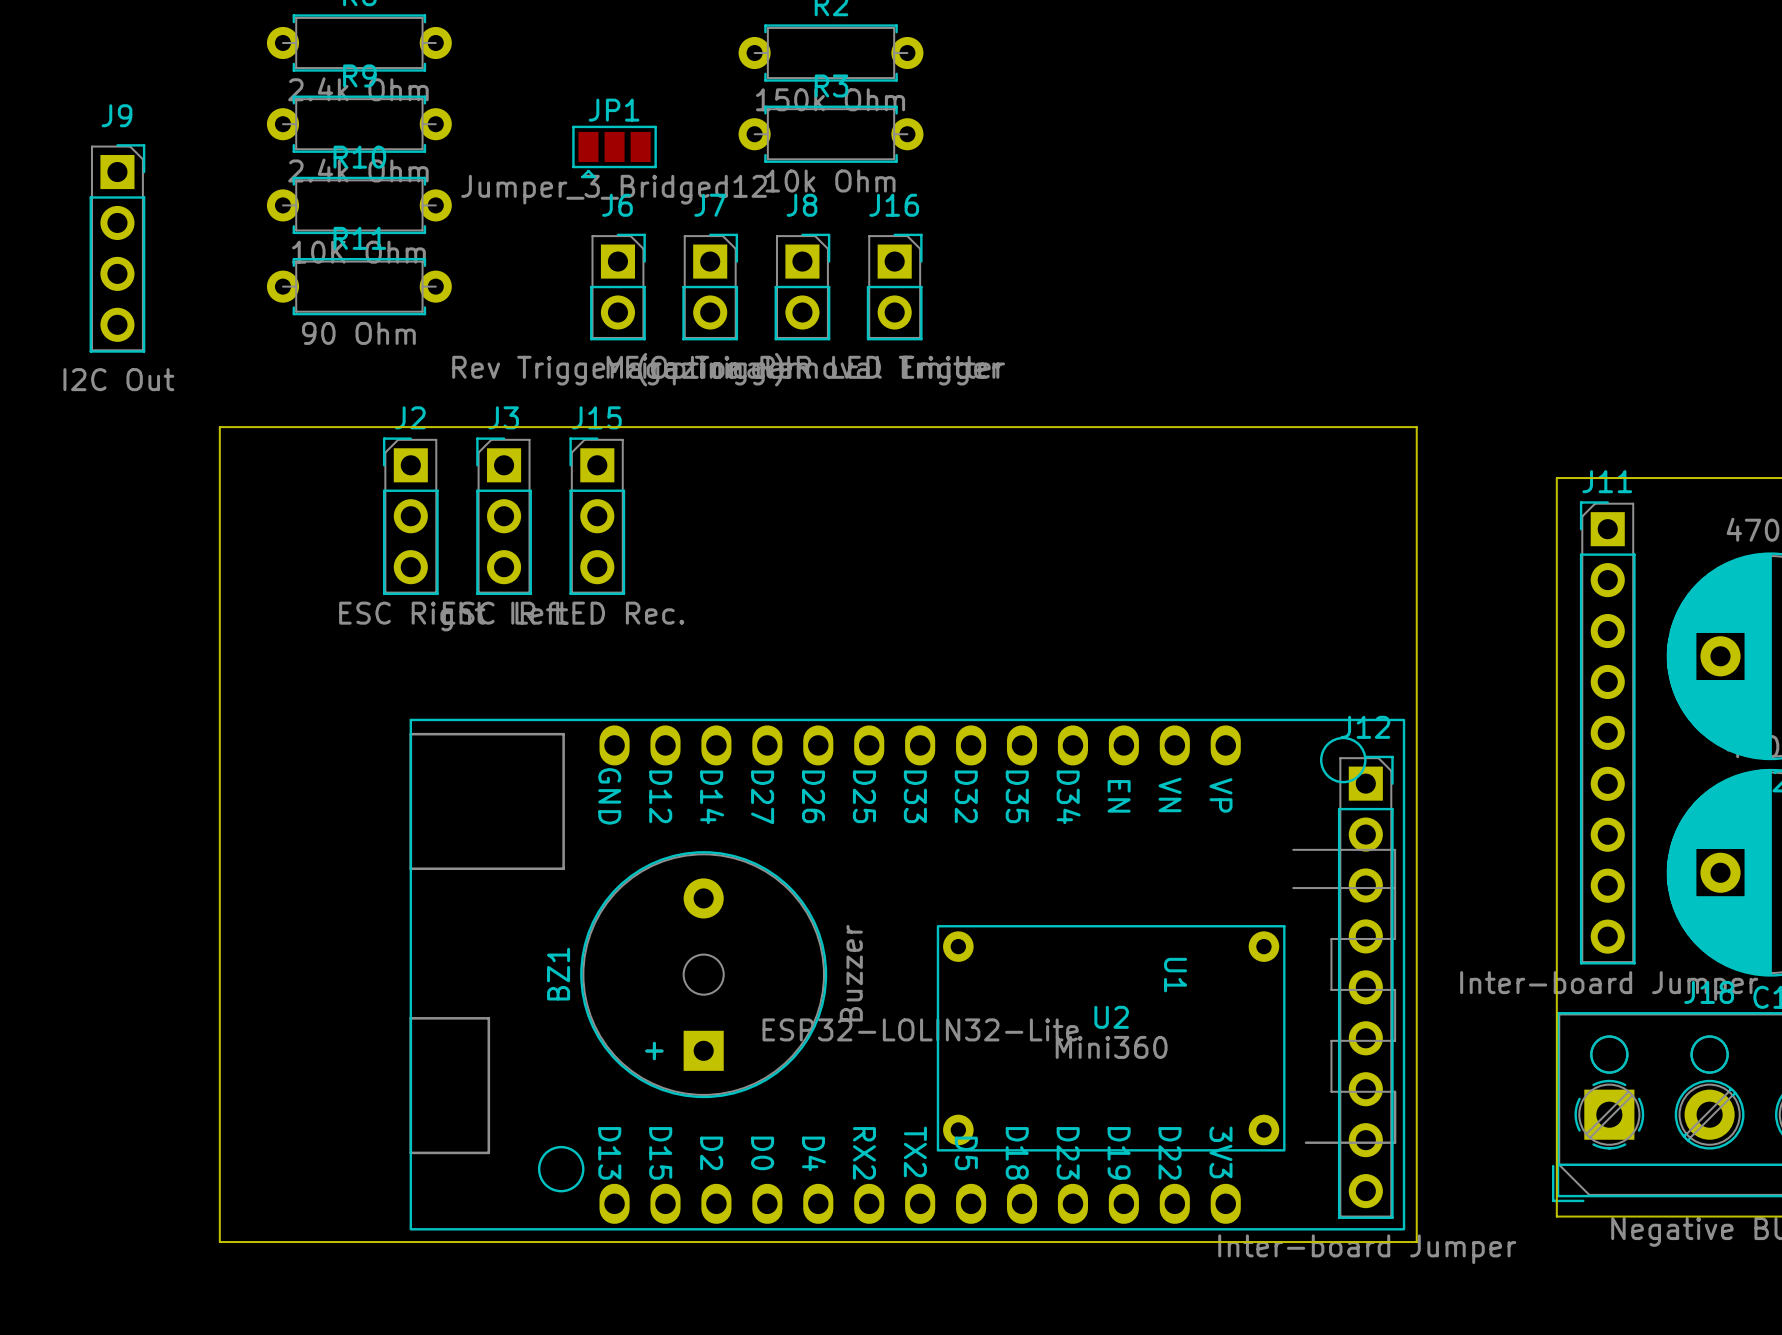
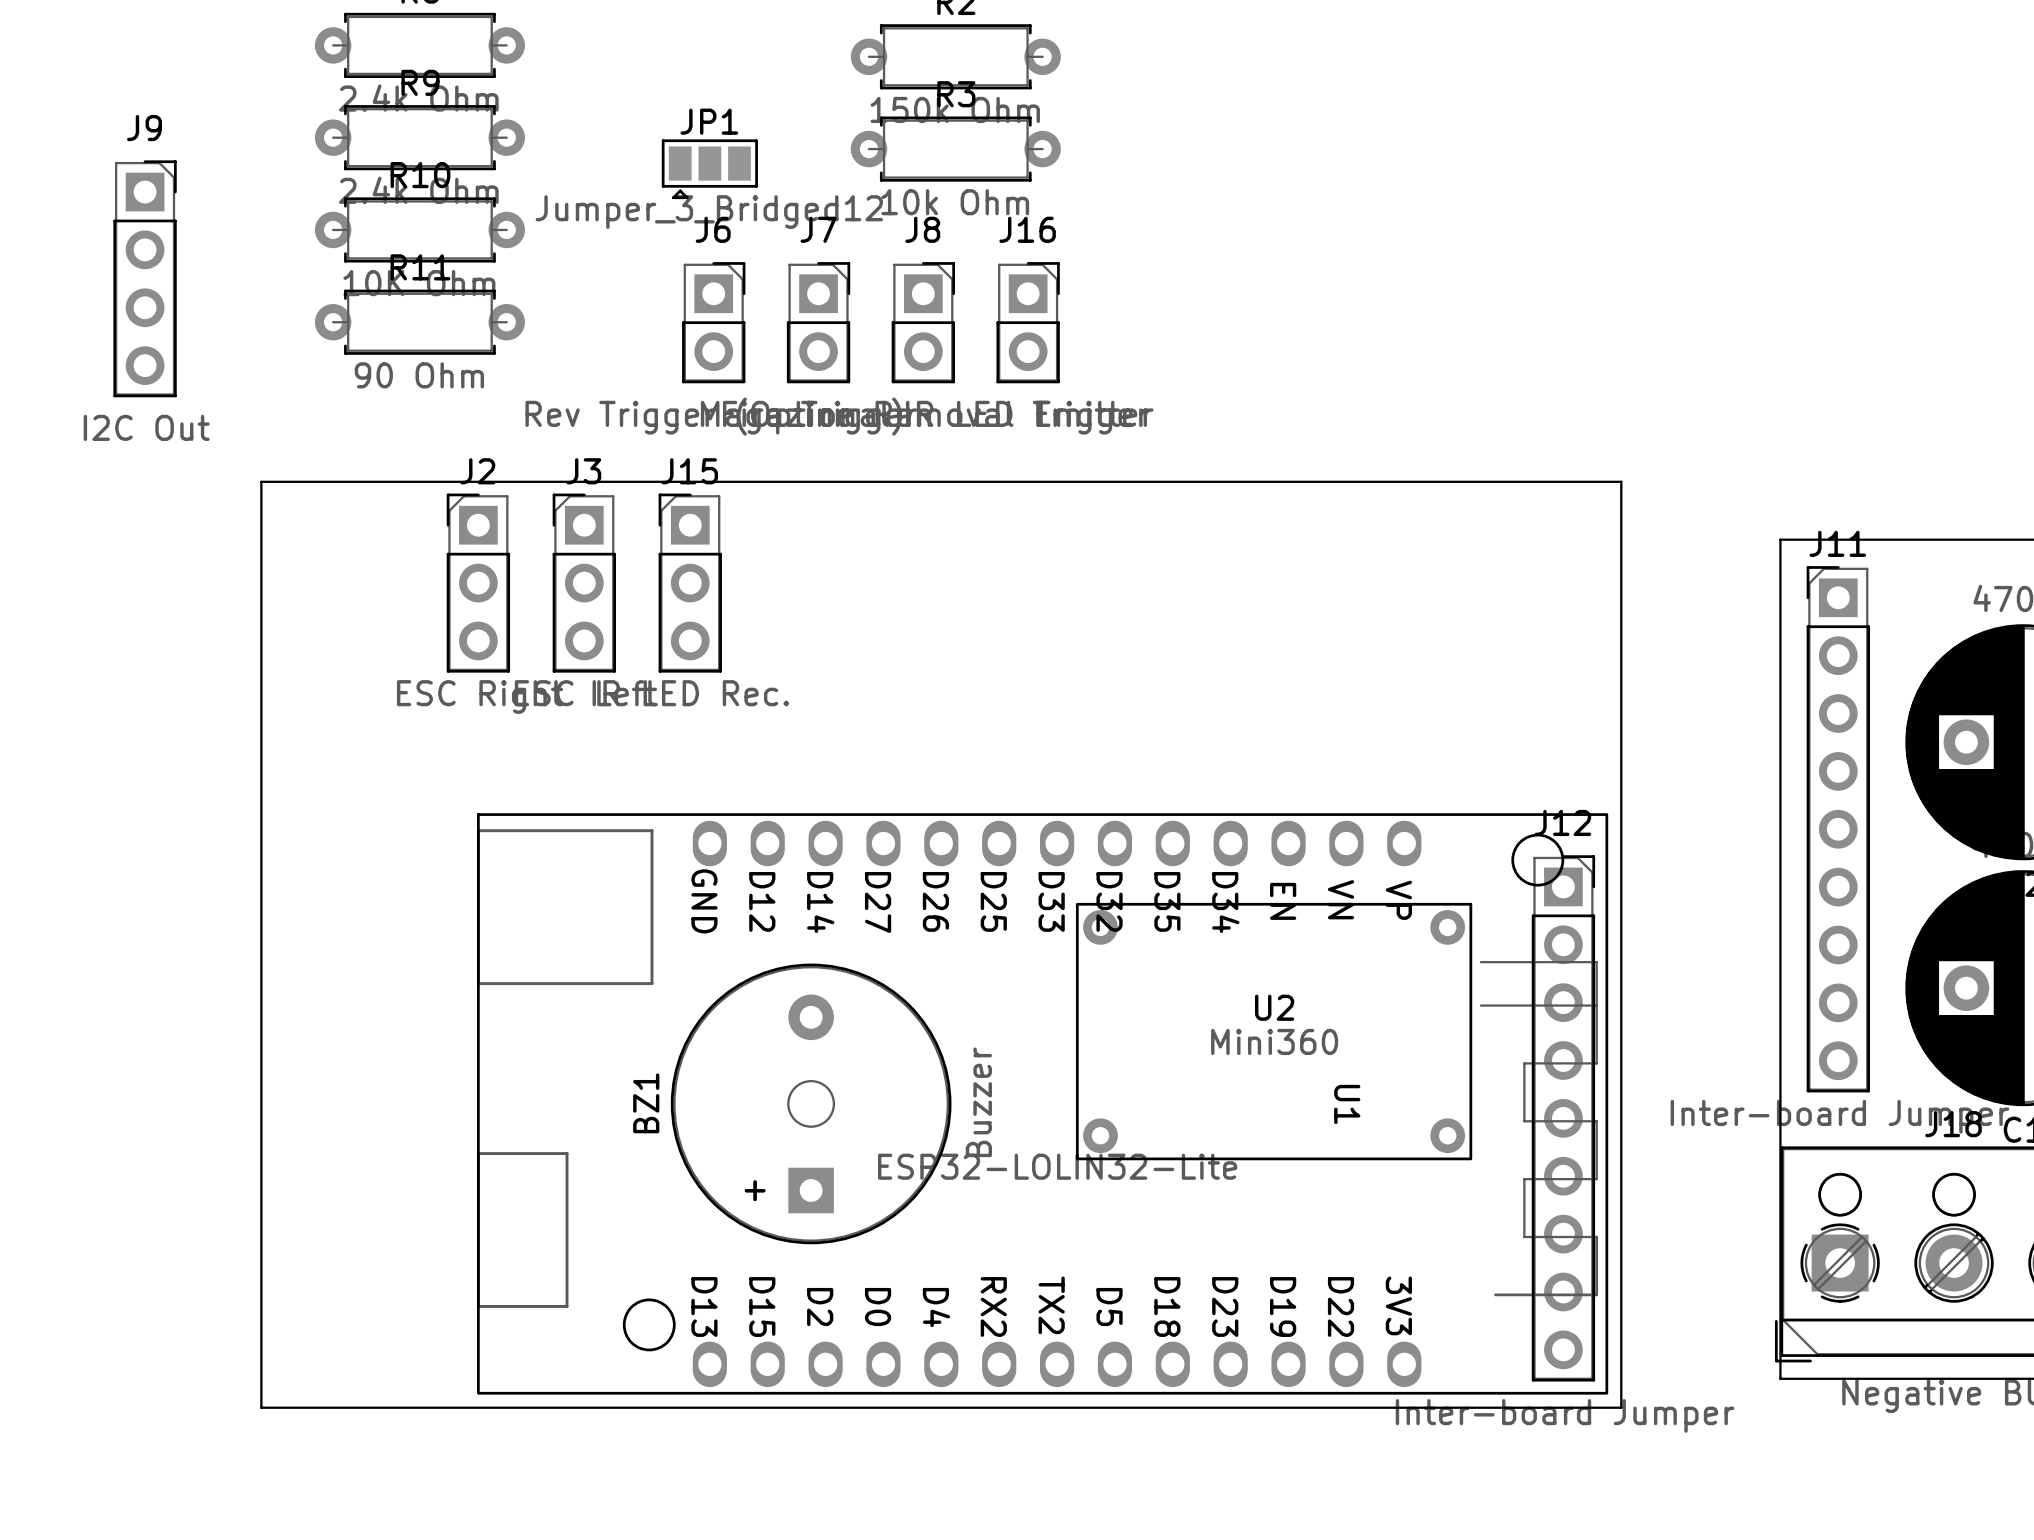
U2 position: (1111, 1038) -> (1274, 1031)

